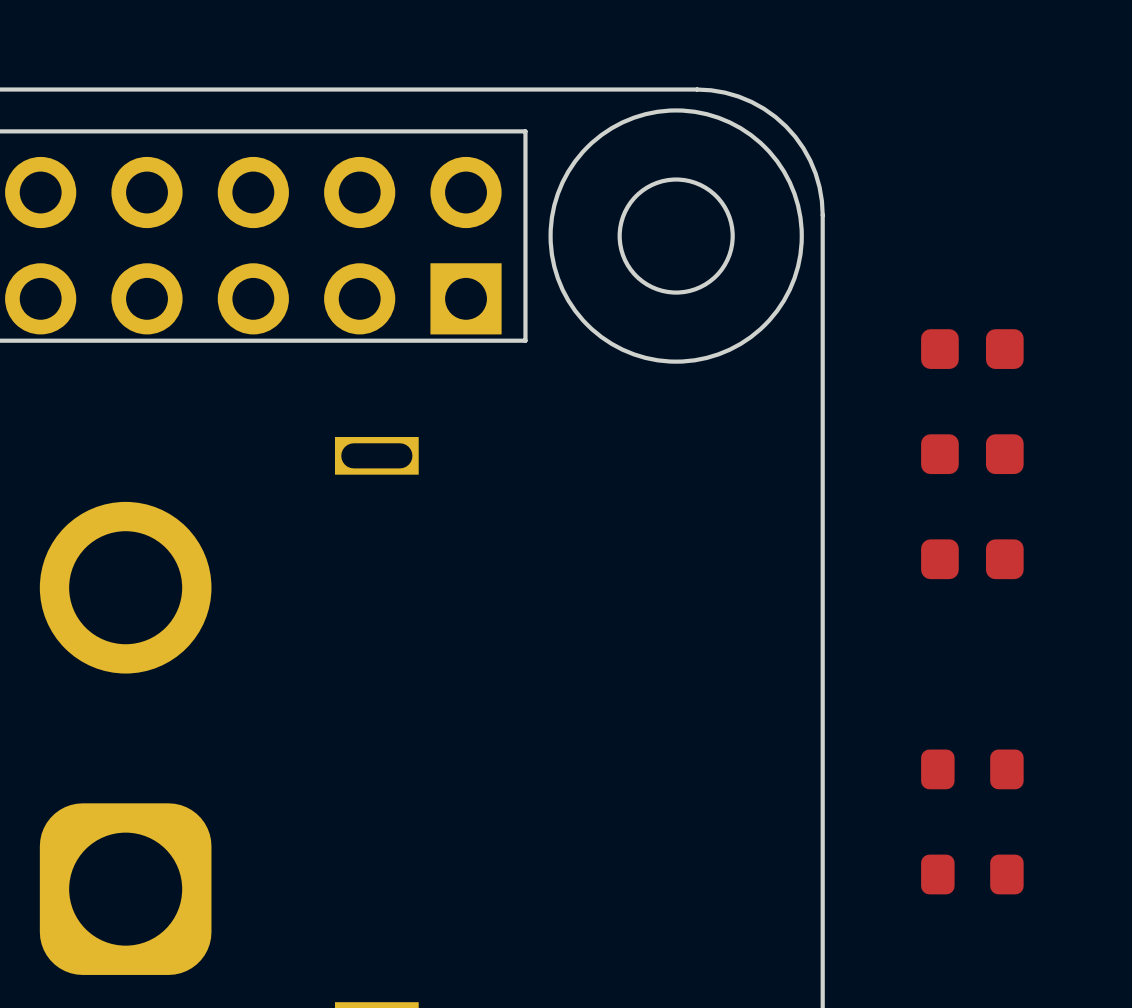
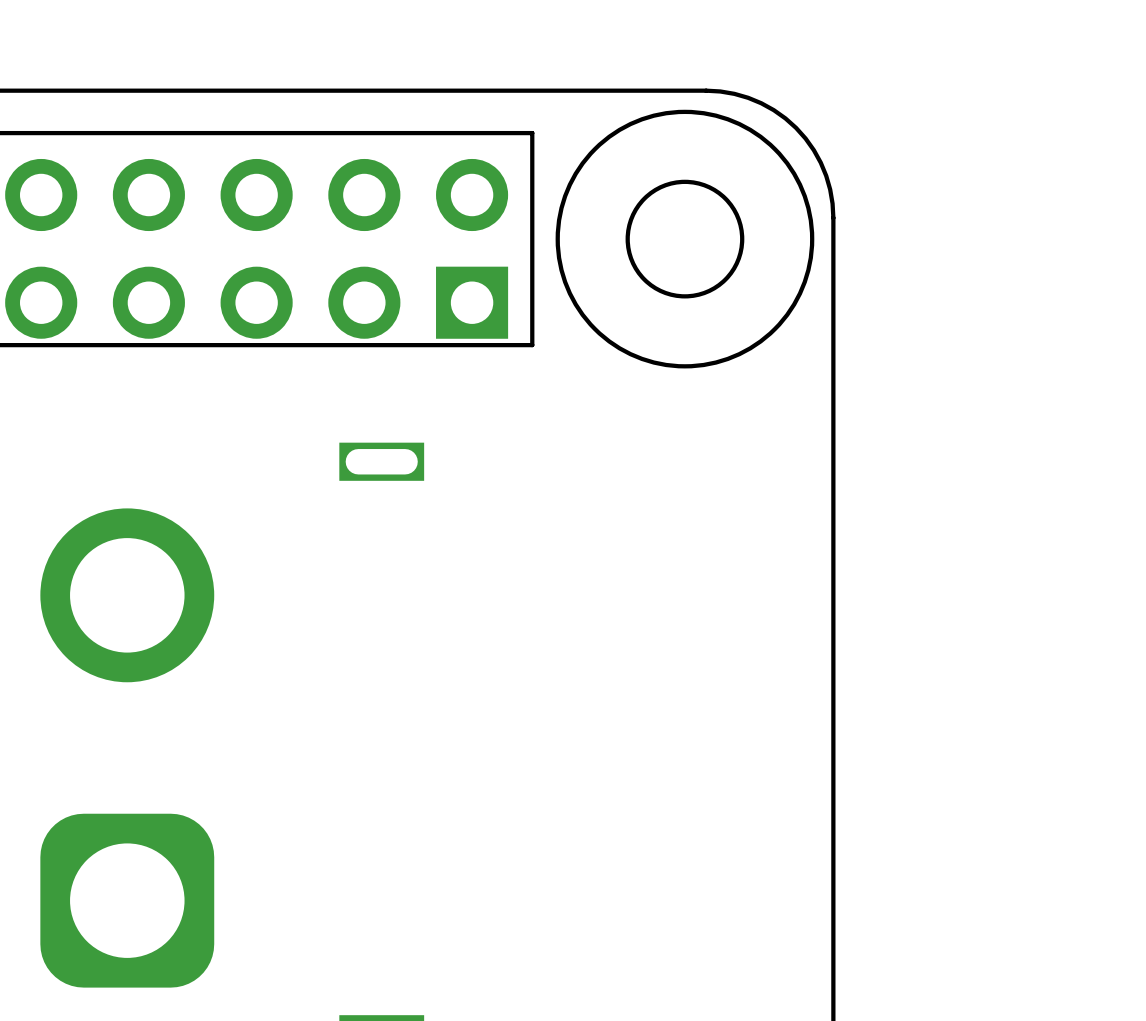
part: (972, 349) -> none
part: (972, 454) -> none
part: (972, 559) -> none
part: (972, 769) -> none
part: (972, 874) -> none

